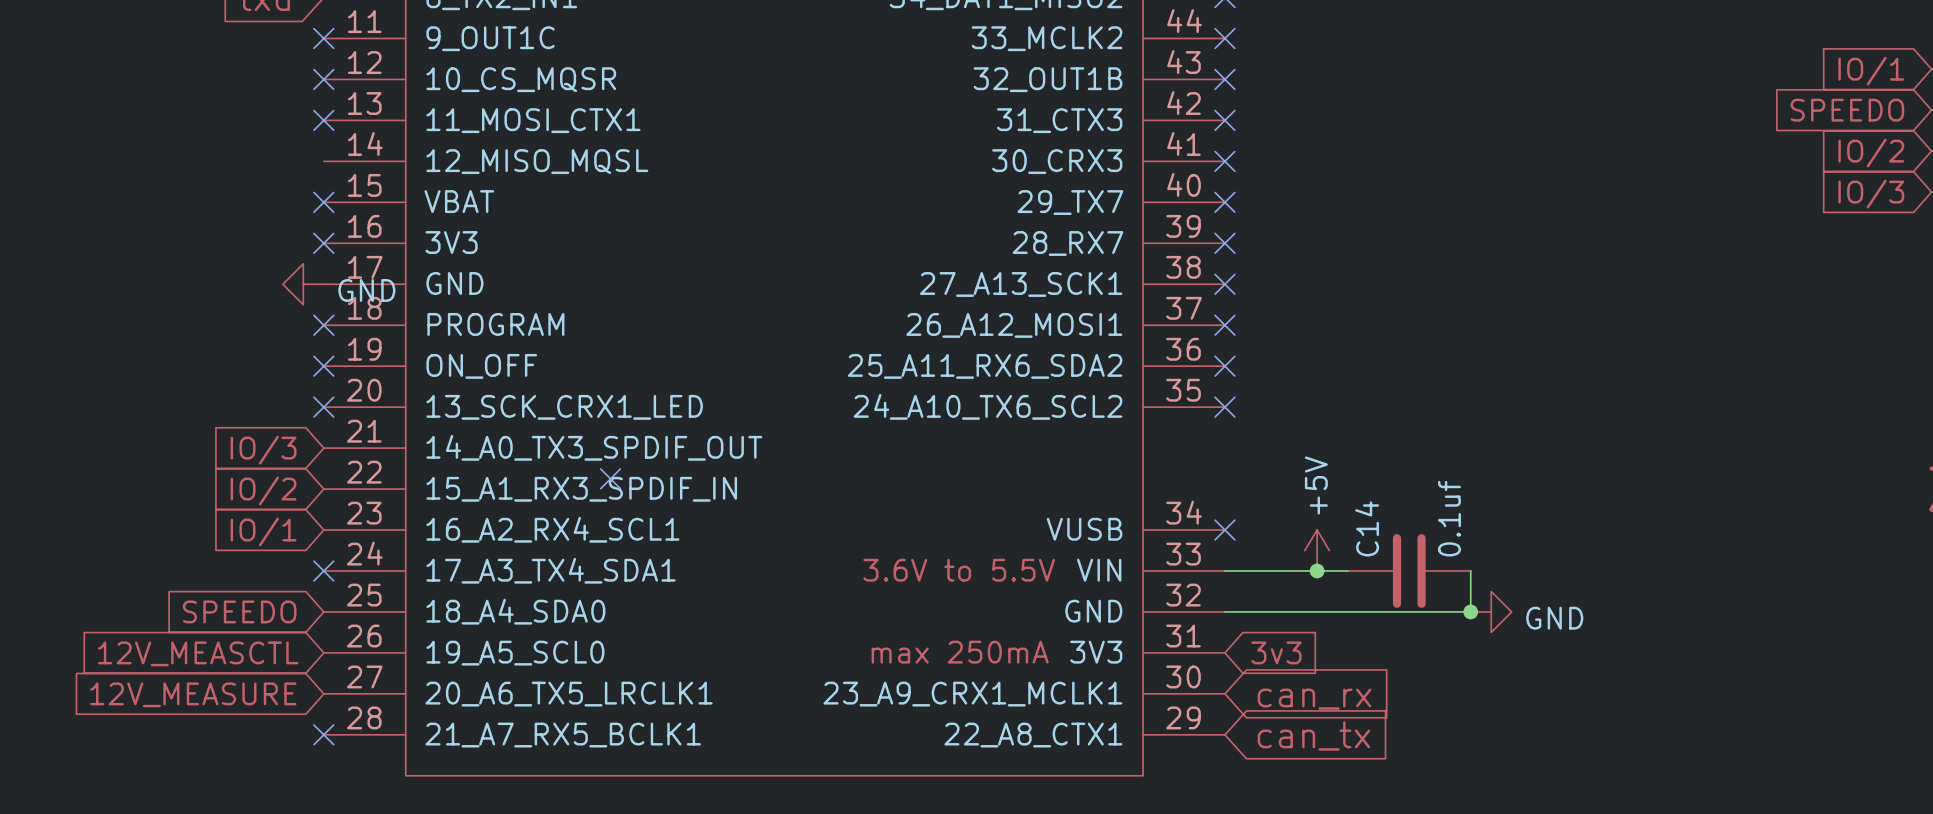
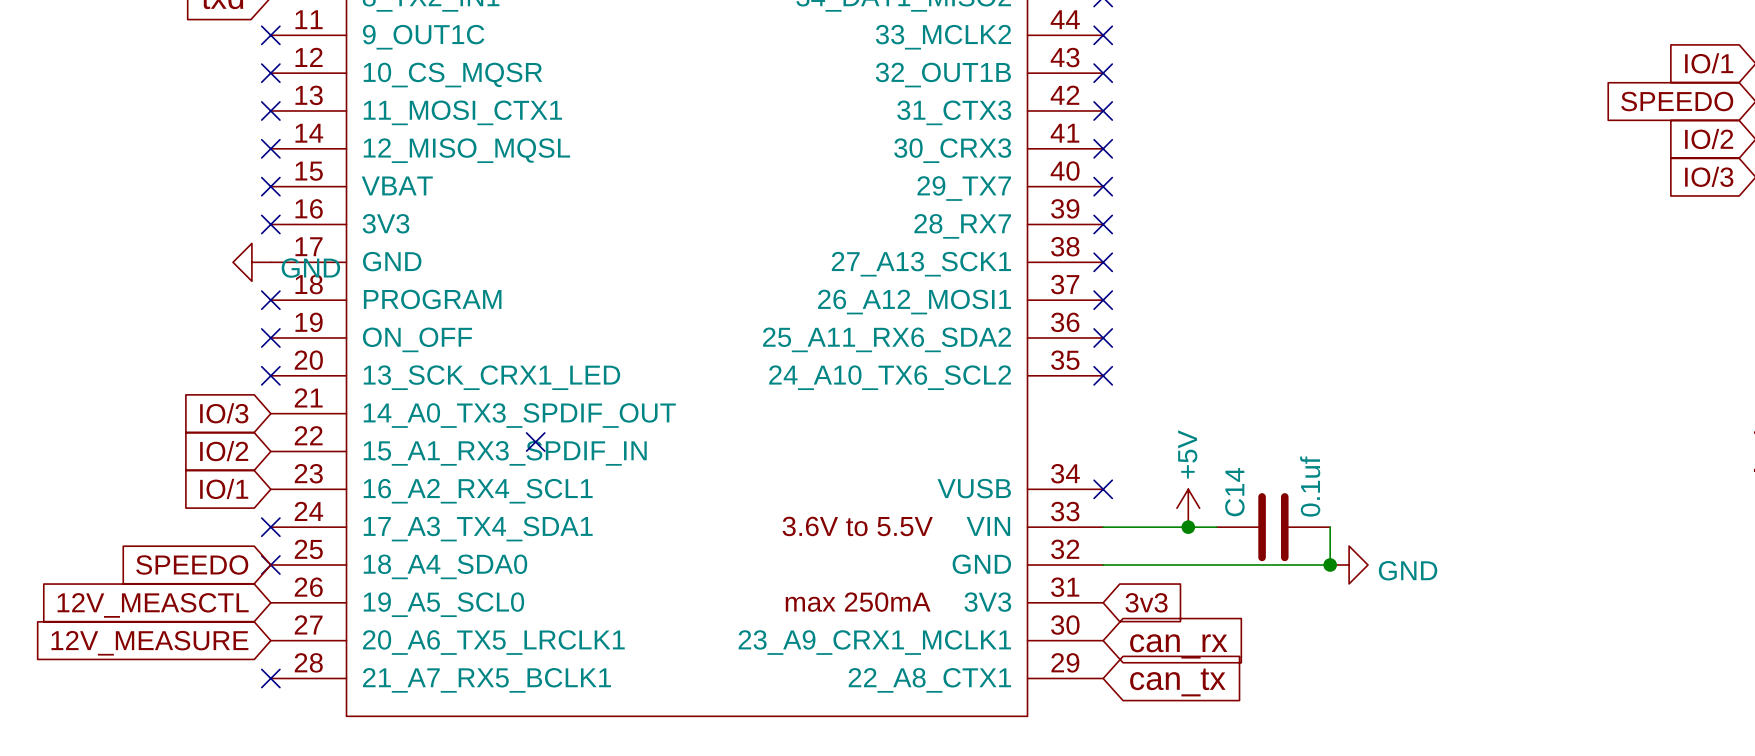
no-connect mark: none -> (270, 148)
no-connect mark: none -> (270, 564)

